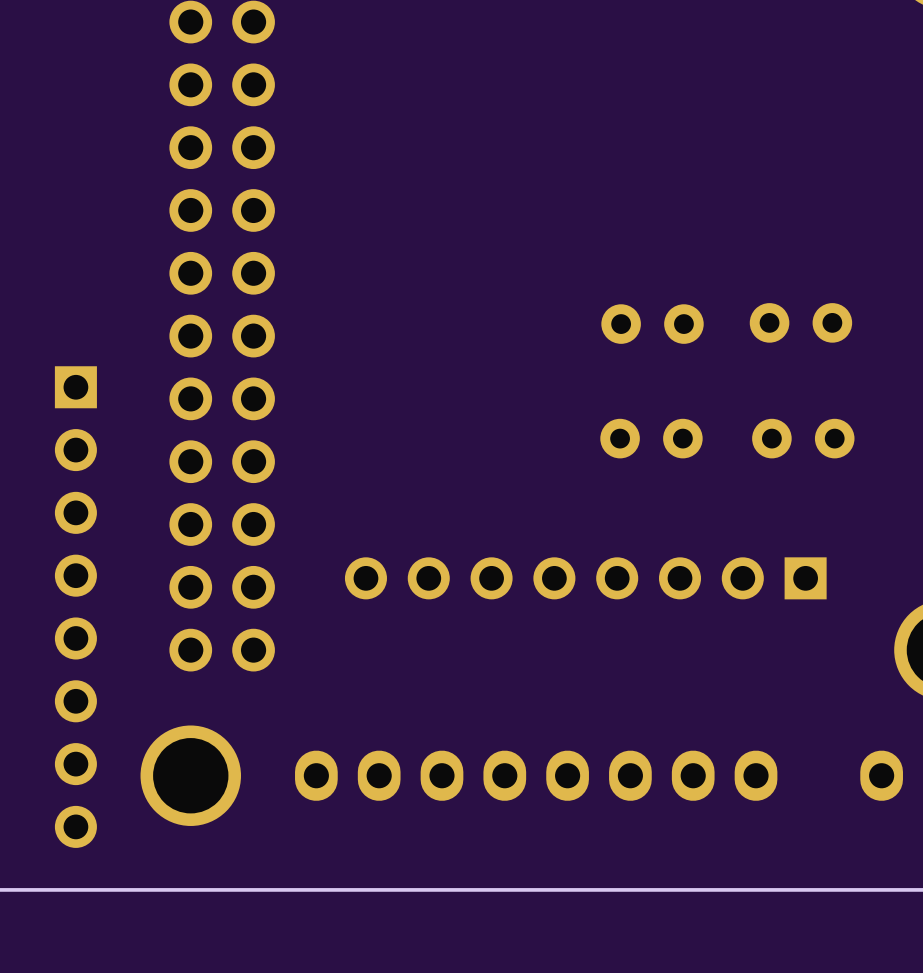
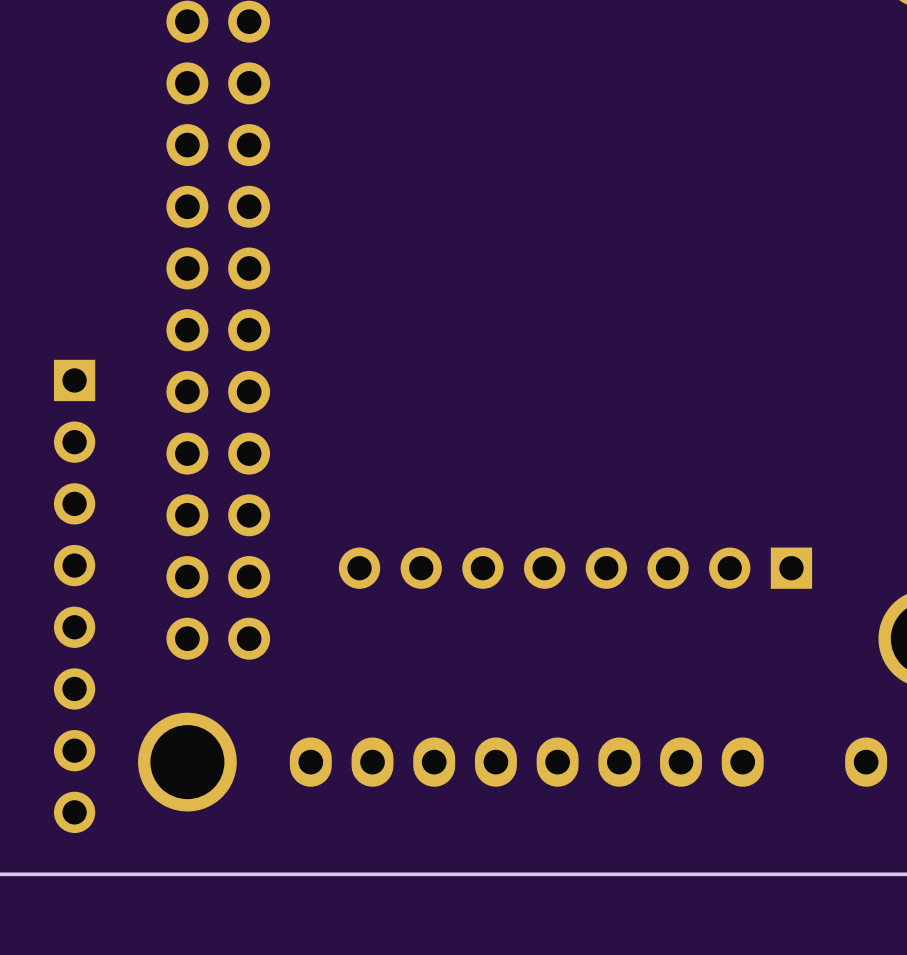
part: (800, 322) -> none
part: (652, 324) -> none
part: (651, 438) -> none
part: (803, 438) -> none

